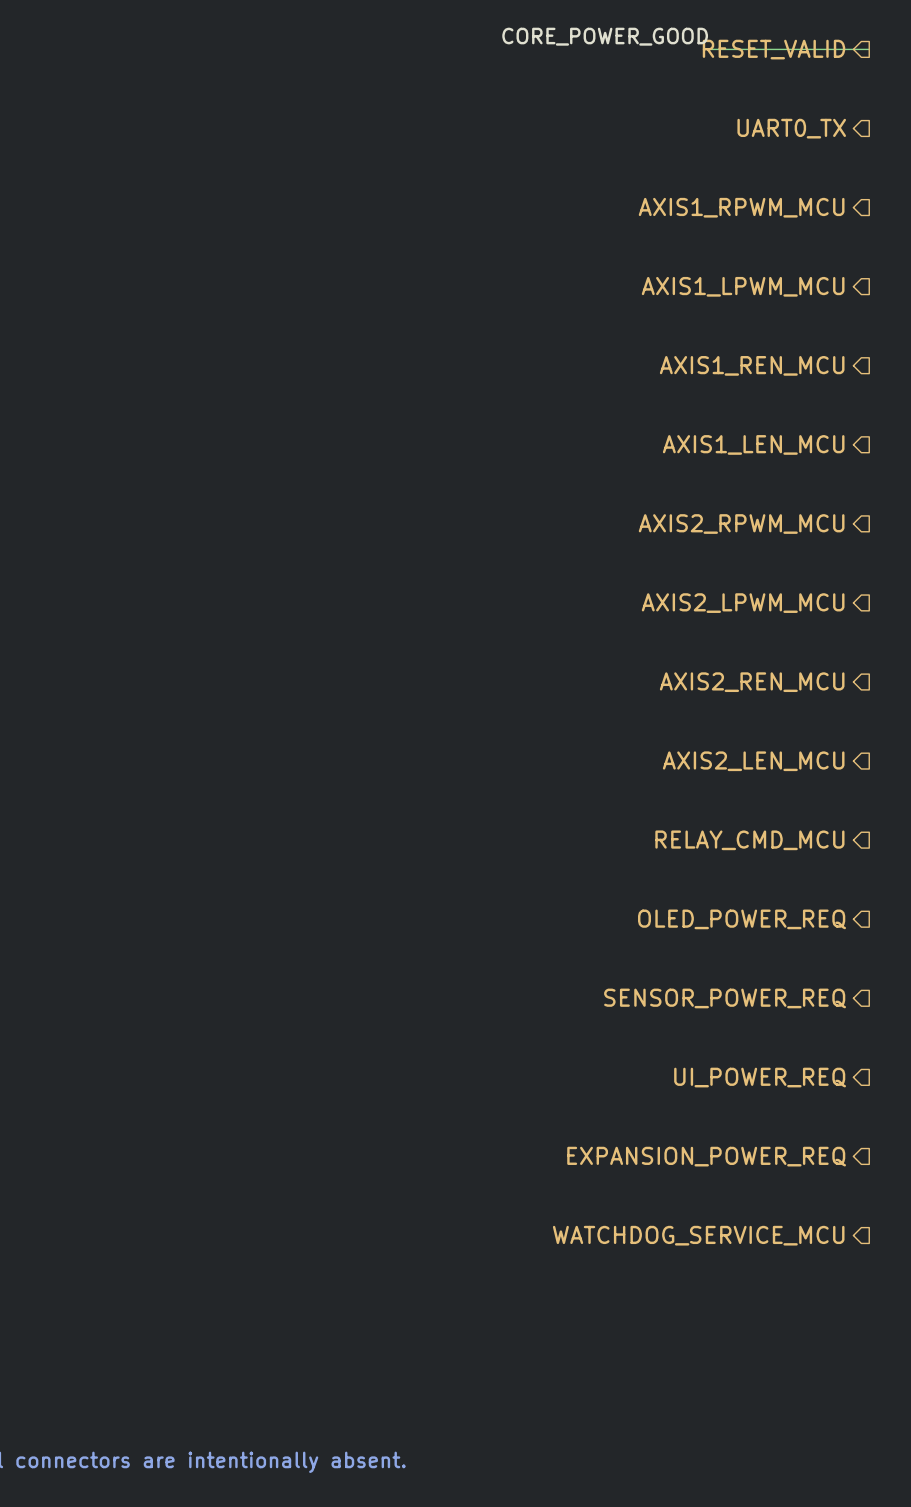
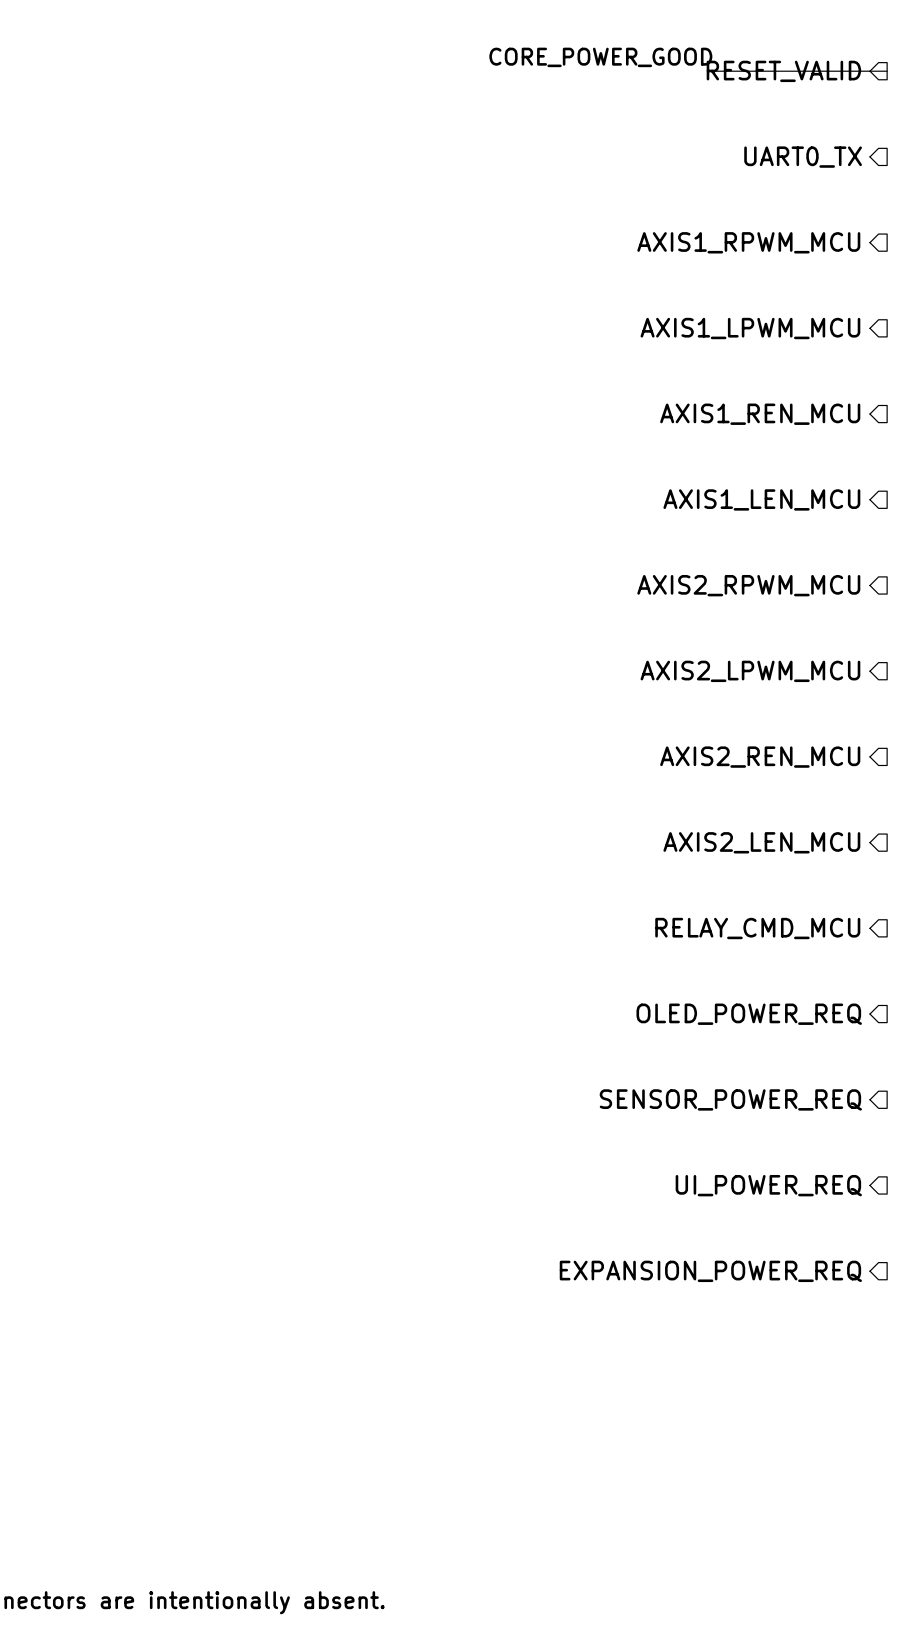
hierarchical label: WATCHDOG_SERVICE_MCU (698, 1235) -> none

